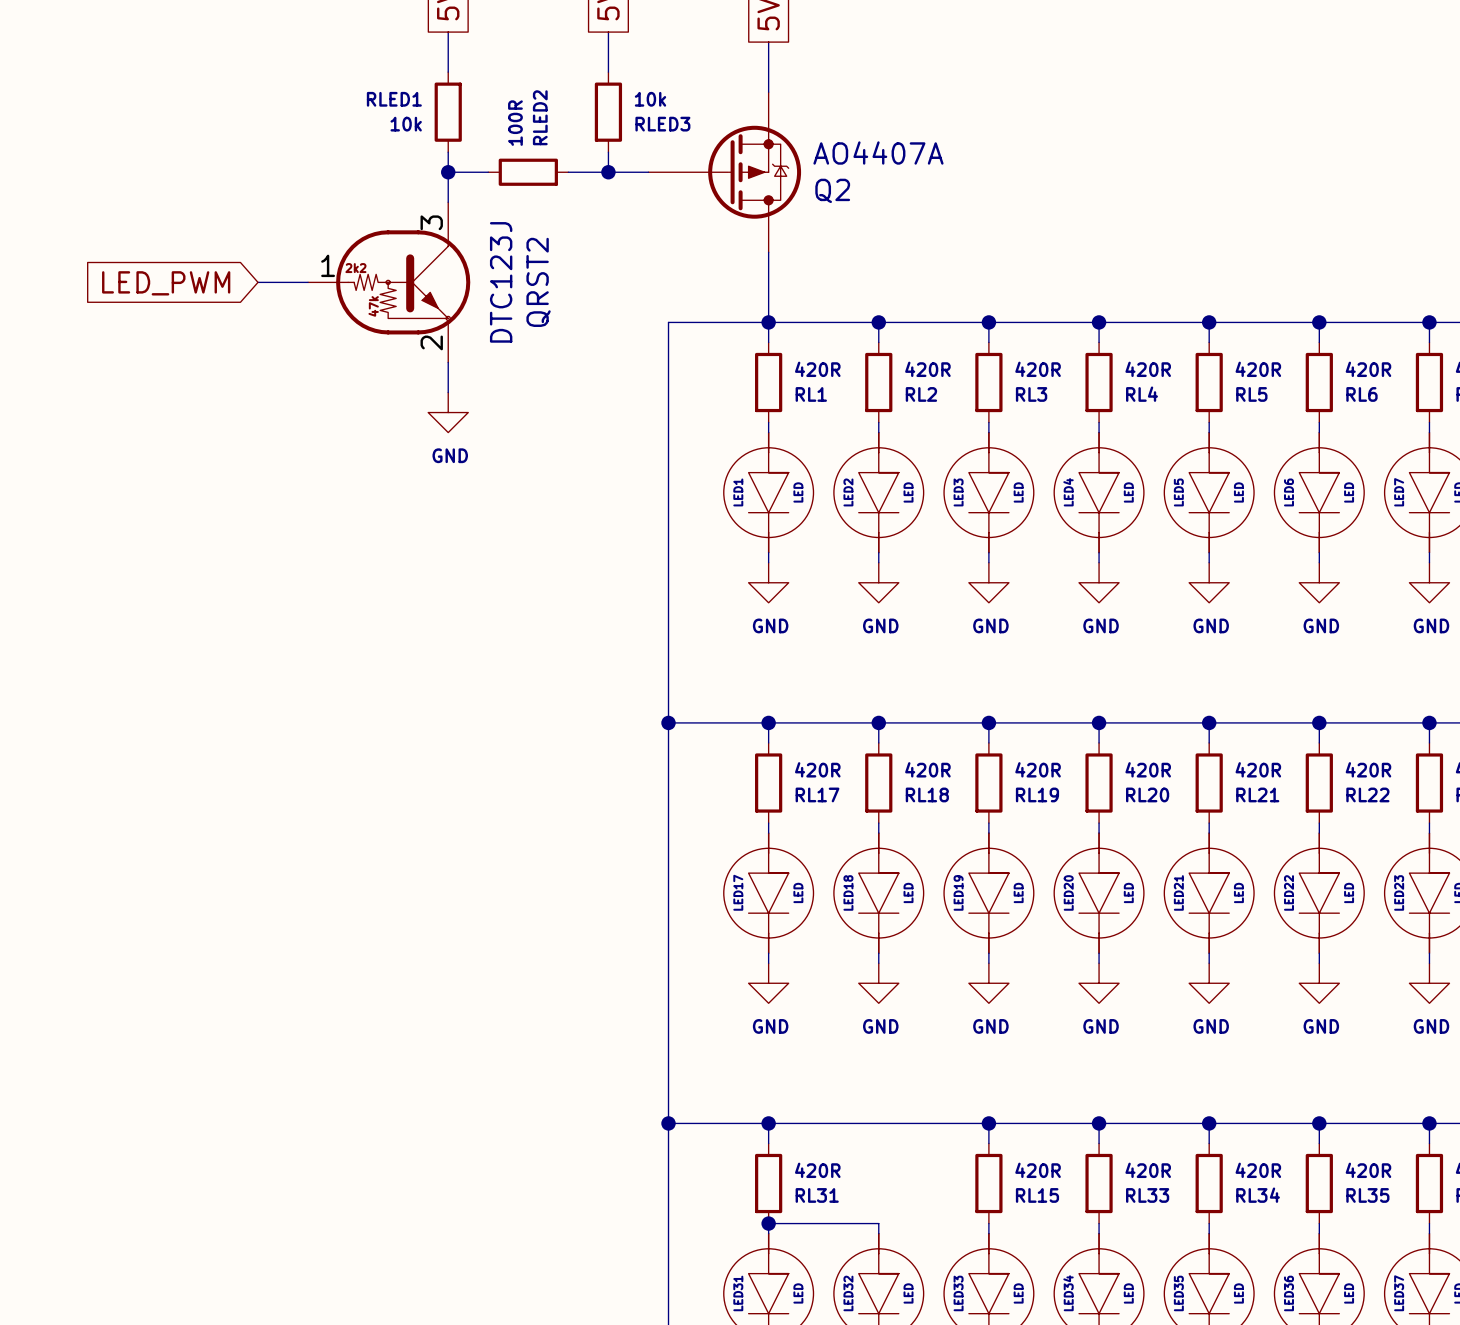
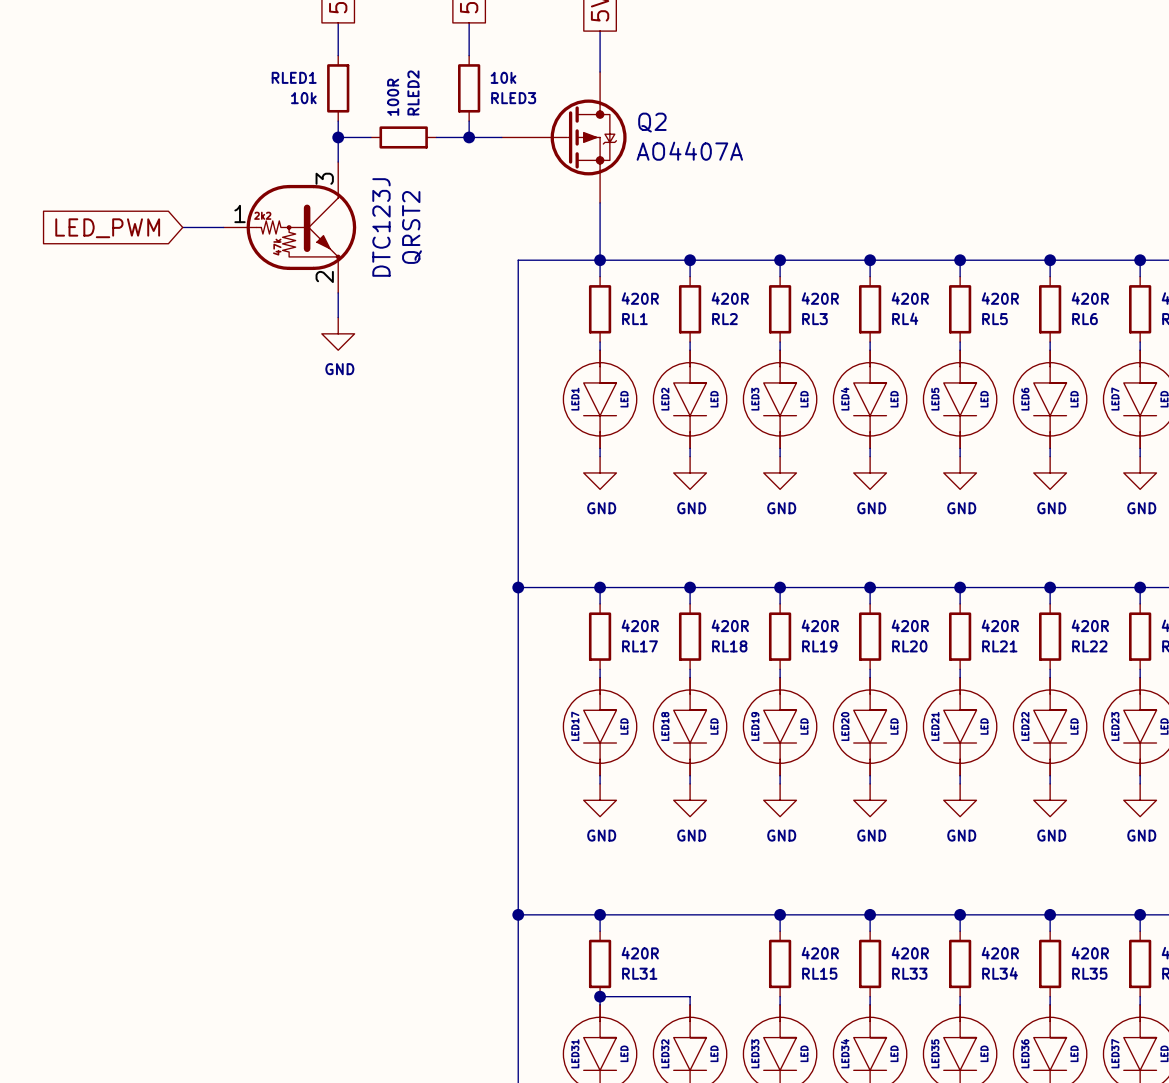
Q2 flip: as is (754, 172) -> up-down (588, 137)

